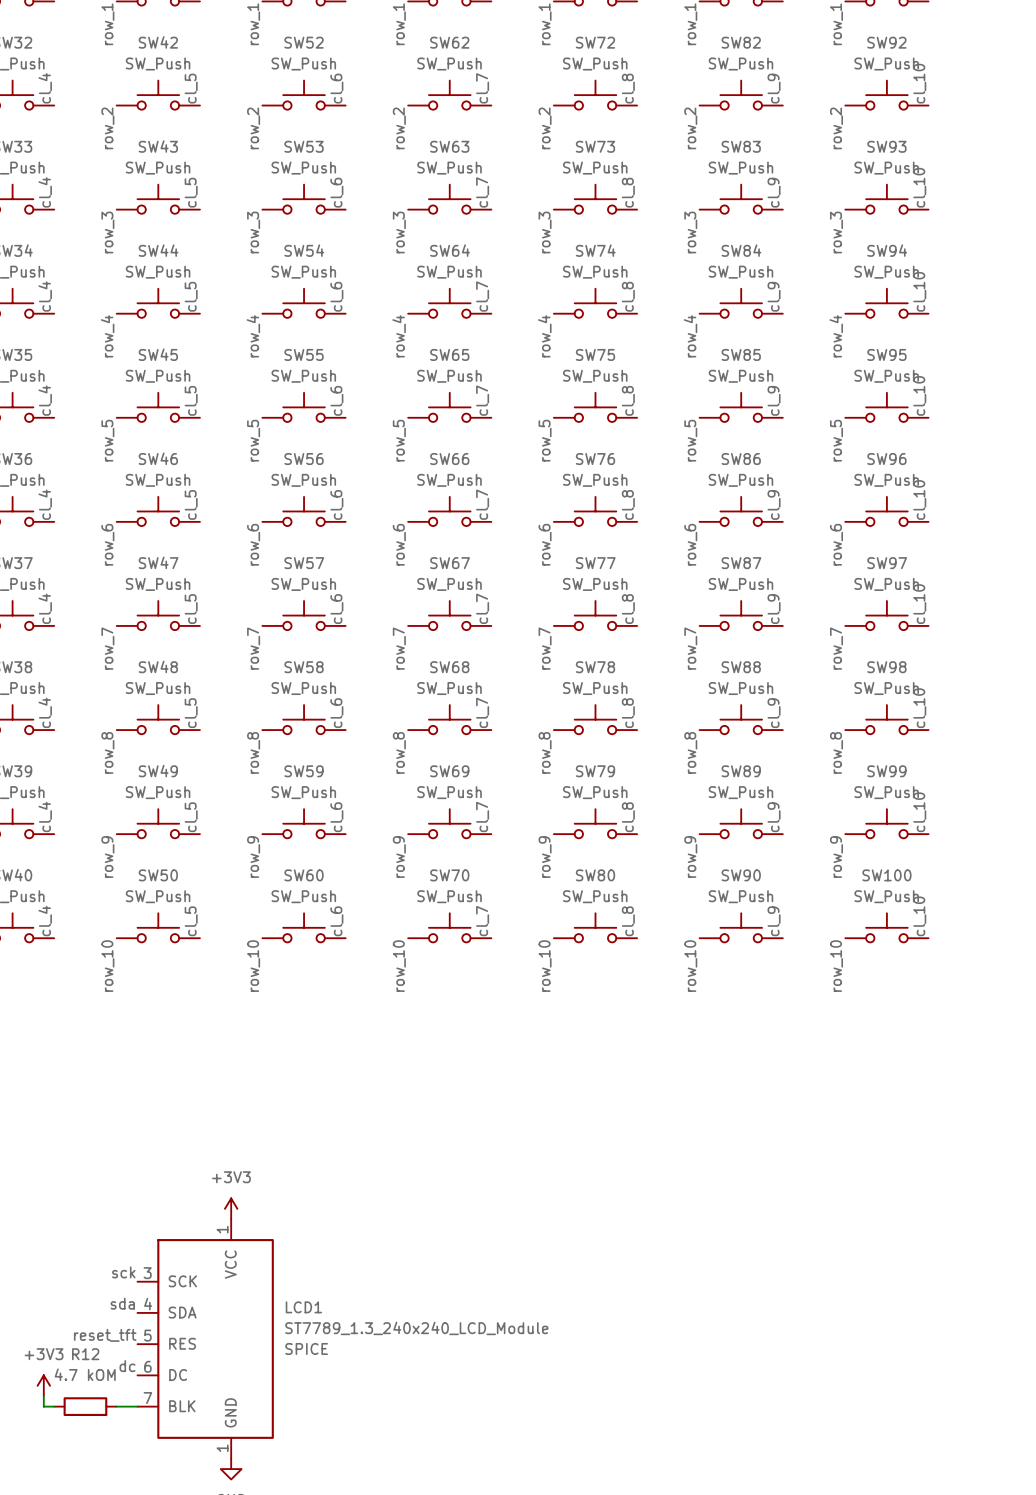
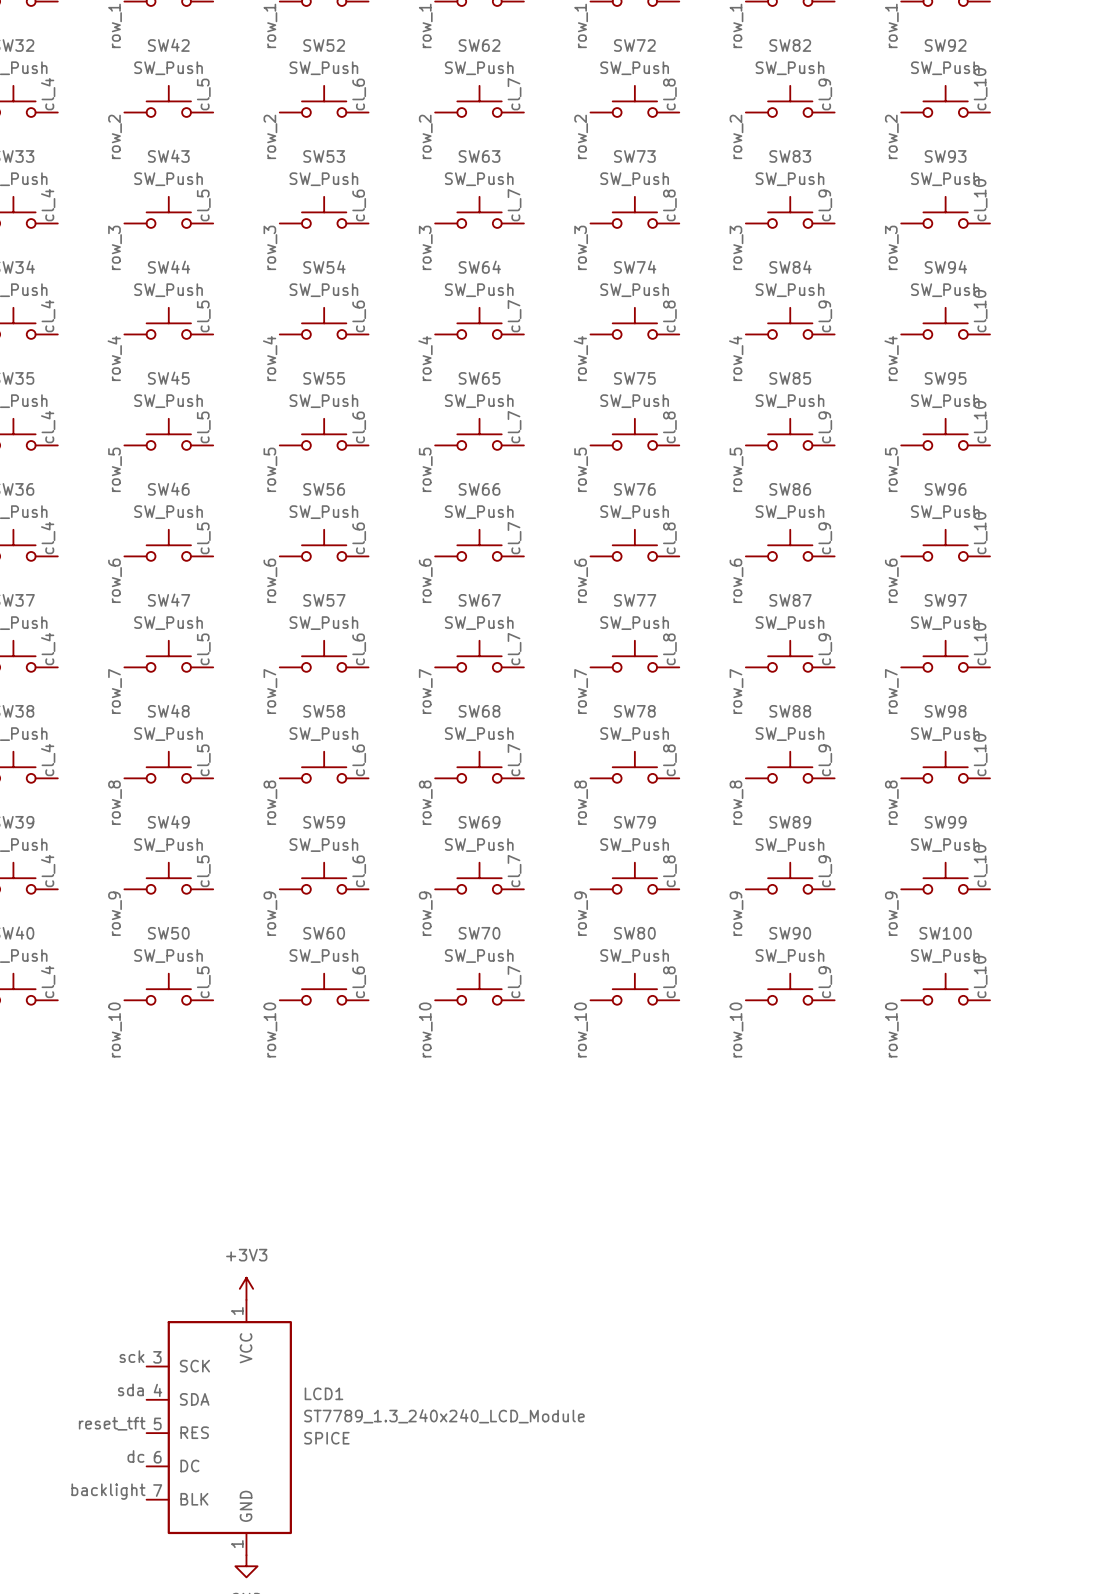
power symbol: +3V3 (43, 1385) -> none
wire: (43, 1396) (43, 1406) (54, 1406) -> none
label: none -> backlight (108, 1491)
R12: 4.7 kOM (85, 1406) -> none
wire: (116, 1406) (137, 1406) -> none

